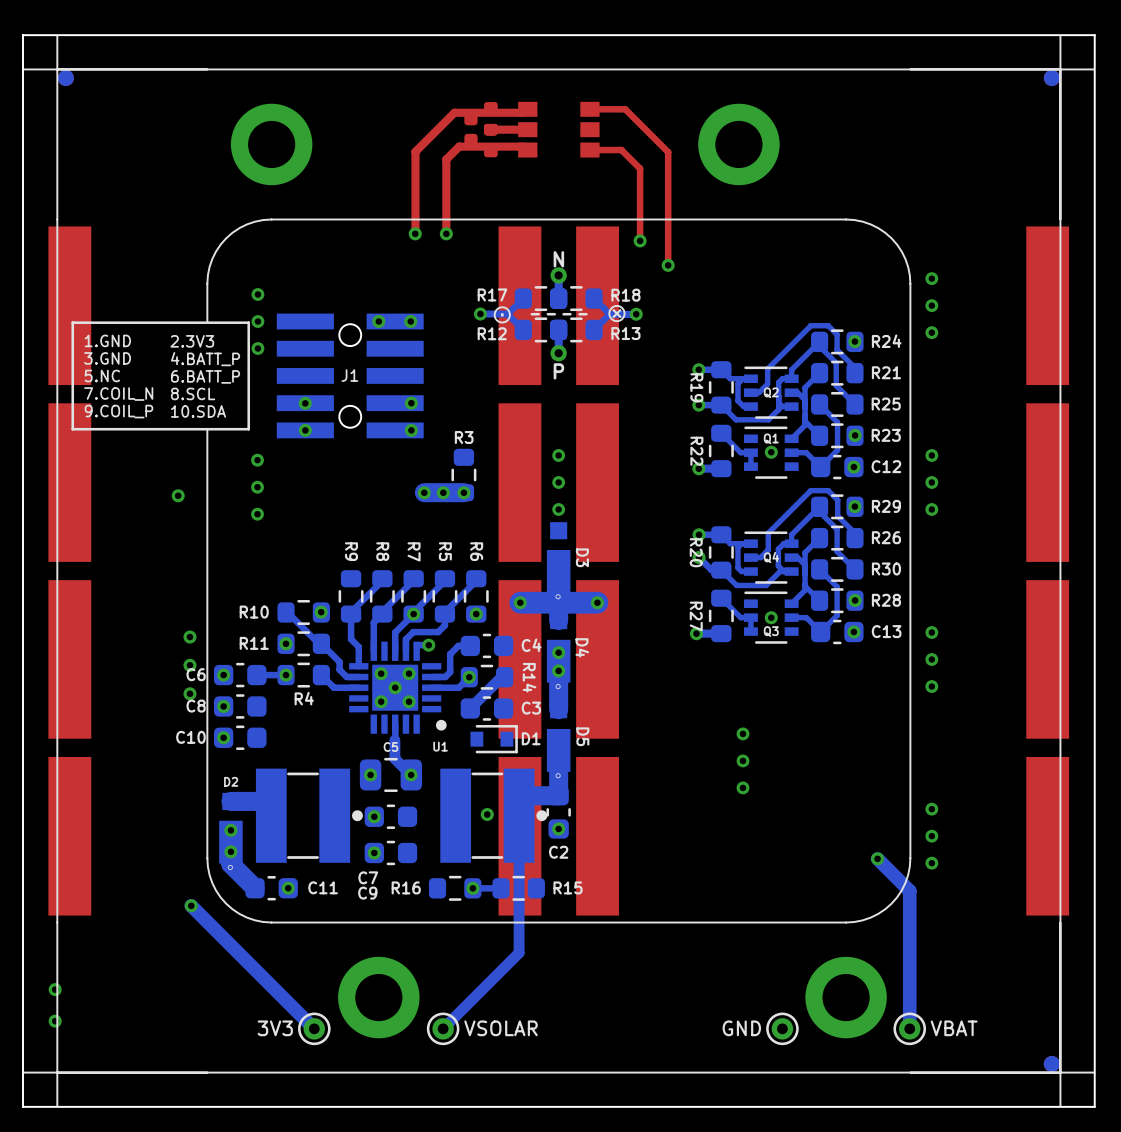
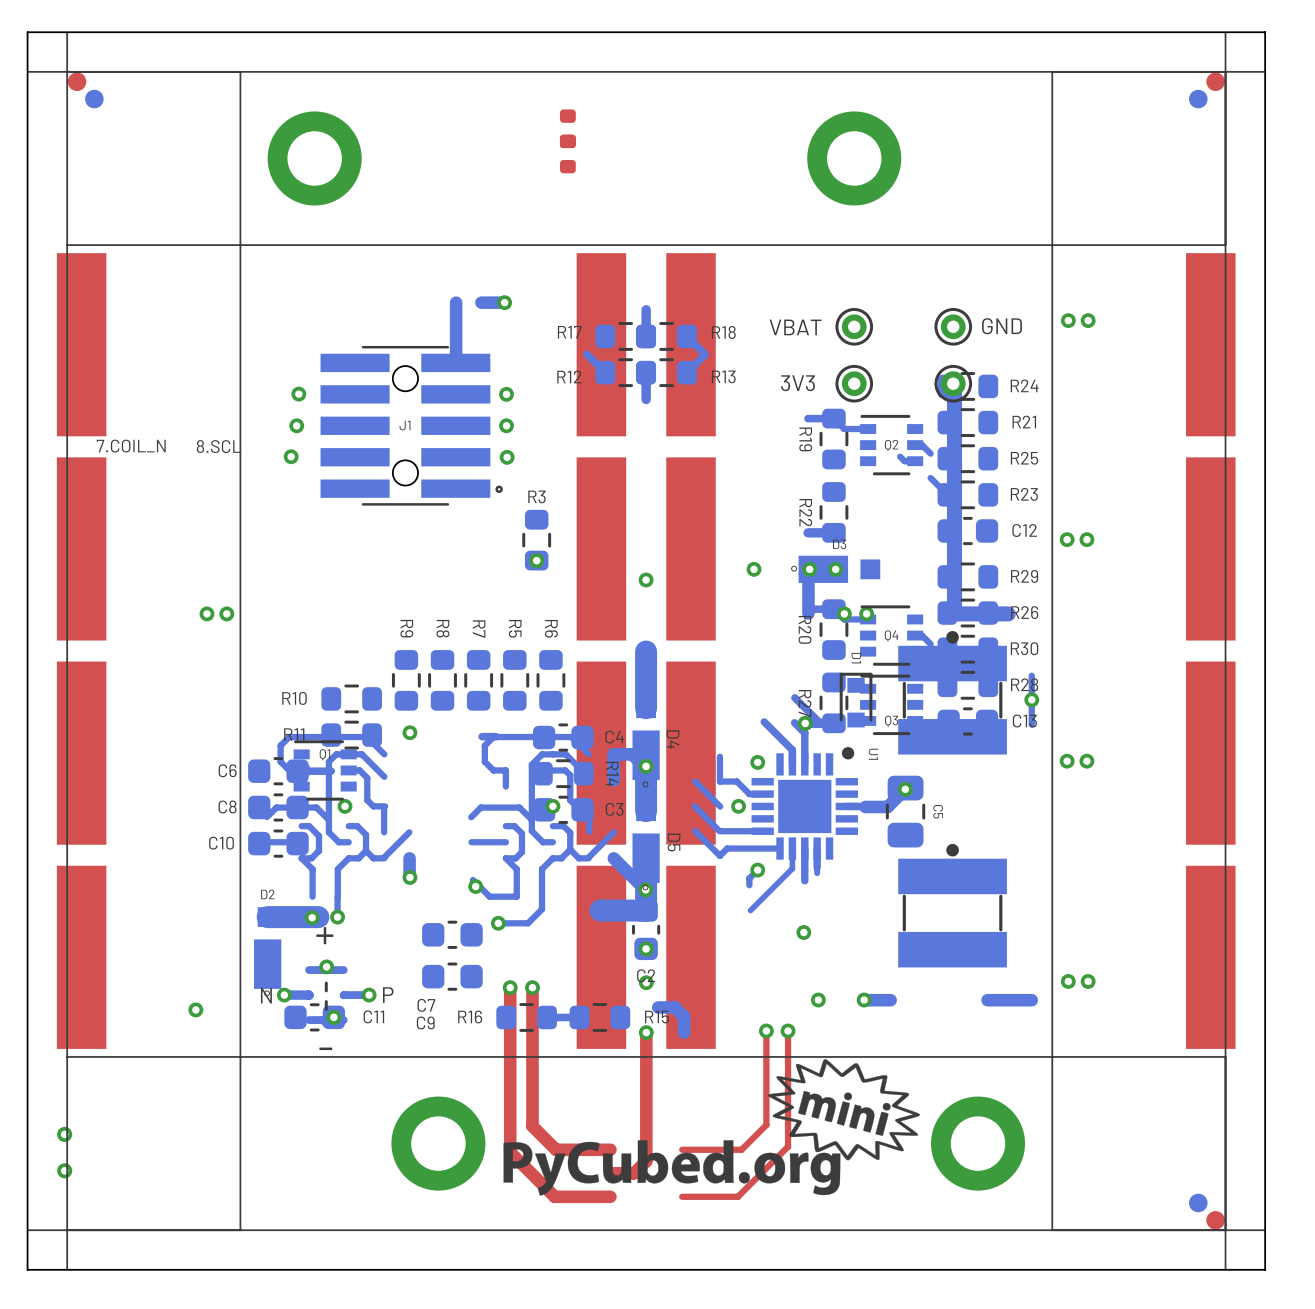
line: none -> (1052, 71) (1052, 319)
part position: (65, 78) -> (94, 99)
part position: (1051, 78) -> (1198, 99)
top track: (589, 109) (625, 109) (668, 152) (668, 265) -> none
top track: (524, 112) (454, 112) (415, 151) (415, 233) -> none
part: (470, 129) -> none
top track: (527, 129) (490, 129) -> none
part: (558, 129) -> none
top track: (524, 146) (459, 146) (446, 159) (446, 233) -> none
top track: (589, 150) (621, 150) (640, 168) (640, 240) -> none
line: (271, 219) (247, 224) (226, 238) (212, 259) (207, 283) -> (240, 71) (240, 319)
line: none -> (314, 245) (67, 245)
line: (846, 219) (870, 224) (891, 238) (905, 259) (910, 283) -> (978, 245) (1225, 245)
via: (415, 233) -> none
via: (446, 233) -> none
via: (640, 240) -> none
text: N (558, 259) -> none
via: (668, 265) -> none
bottom track: none -> (456, 302) (456, 362)
bottom track: none -> (504, 302) (481, 302)
via: none -> (504, 302)
via: (558, 275) -> none
via: (931, 278) -> none
via: none -> (1068, 320)
via: none -> (1088, 320)
text: none -> GND (1002, 326)
text: none -> VBAT (795, 327)
part: none -> (854, 326)
part: none -> (953, 326)
via: (257, 294) -> none
bottom track: (523, 298) (507, 314) (480, 314) -> none
via: (931, 305) -> none
J1 footprint: [276, 313, 424, 439] -> [320, 345, 503, 506]
text: ⊗ (616, 313) -> none
via: (480, 314) -> none
text: ⊙ (502, 314) -> none
line: (538, 314) (531, 314) -> none
line: (554, 314) (547, 314) -> none
line: (570, 314) (563, 314) -> none
line: (586, 314) (579, 314) -> none
bottom track: (636, 314) (609, 314) -> none
via: (636, 314) -> none
line: none -> (240, 363) (240, 487)
via: (257, 321) -> none
via: (378, 321) -> none
via: (410, 321) -> none
line: (248, 322) (72, 322) (72, 429) (248, 429) (248, 322) -> none
via: (931, 332) -> none
text: none -> 3V3 (798, 383)
part: none -> (854, 383)
part: none -> (953, 383)
text: 1.GND (107, 340) -> none
bottom track: none -> (954, 384) (954, 613) (1008, 613)
text: 2.3V3 (192, 341) -> none
bottom track: (819, 341) (791, 369) (791, 378) (782, 378) (778, 382) (778, 409) (768, 419) (736, 419) (721, 405) (698, 405) -> none
via: (854, 341) -> none
bottom track: (819, 346) (836, 362) (836, 385) (854, 404) -> none
via: none -> (506, 394)
via: (558, 353) -> none
text: 3.GND (107, 358) -> none
text: 4.BATT_P (205, 359) -> none
bottom track: (854, 367) (837, 349) (837, 334) (828, 325) (810, 325) (767, 368) (767, 383) (758, 392) (750, 392) -> none
via: (698, 369) -> none
text: P (558, 371) -> none
bottom track: (819, 373) (805, 387) (805, 425) (791, 438) -> none
text: 5.NC (102, 375) -> none
via: none -> (296, 425)
via: none -> (506, 425)
text: 6.BATT_P (205, 376) -> none
bottom track: (743, 378) (737, 383) (737, 400) (743, 406) (750, 406) -> none
via: none -> (291, 456)
via: (305, 403) -> none
via: (411, 403) -> none
via: none -> (507, 457)
bottom track: (819, 404) (837, 422) (837, 450) (820, 467) (806, 452) (791, 452) -> none
via: (698, 405) -> none
text: 9.COIL_P (118, 411) -> none
text: 10.SDA (198, 411) -> none
via: (305, 430) -> none
via: (411, 430) -> none
bottom track: (721, 433) (740, 452) (750, 452) (750, 466) -> none
via: (855, 435) -> none
Q1 position: (771, 452) -> (325, 770)
via: (771, 452) -> none
via: (558, 455) -> none
via: (931, 455) -> none
via: (257, 460) -> none
via: (853, 467) -> none
via: (698, 468) -> none
via: none -> (1067, 539)
via: none -> (1086, 539)
via: (558, 482) -> none
via: (931, 482) -> none
via: (257, 487) -> none
via: (424, 492) -> none
via: (443, 492) -> none
bottom track: (463, 492) (424, 492) -> none
via: (178, 495) -> none
via: none -> (754, 569)
via: none -> (809, 569)
via: none -> (835, 569)
bottom track: (819, 506) (791, 534) (791, 543) (783, 543) (778, 549) (778, 565) (783, 571) -> none
via: (854, 506) -> none
via: (931, 509) -> none
bottom track: (819, 511) (837, 529) (837, 551) (854, 569) -> none
bottom track: none -> (808, 584) (808, 613)
via: (257, 514) -> none
bottom track: (854, 533) (837, 516) (837, 500) (828, 490) (810, 490) (768, 533) (768, 549) (760, 557) (750, 557) -> none
via: (699, 534) -> none
via: none -> (207, 613)
via: none -> (226, 613)
via: none -> (844, 613)
via: none -> (866, 613)
bottom track: (819, 538) (805, 552) (805, 590) (791, 603) -> none
bottom track: (741, 543) (737, 547) (737, 567) (741, 571) (750, 571) -> none
bottom track: (699, 557) (711, 570) (721, 570) (736, 585) (766, 585) (780, 571) (791, 571) -> none
via: (699, 557) -> none
D3 rotation: 0° (558, 560) -> 90° clockwise (835, 569)
D3 position: (558, 560) -> (835, 569)
bottom track: (819, 569) (837, 586) (837, 615) (820, 631) (806, 617) (791, 617) -> none
bottom track: (382, 580) (351, 612) -> none
bottom track: (413, 580) (382, 611) -> none
bottom track: (444, 580) (413, 612) -> none
bottom track: (476, 580) (444, 612) -> none
bottom track: none -> (1031, 675) (1031, 724)
bottom track: (721, 598) (740, 617) (750, 617) (750, 631) -> none
via: (855, 600) -> none
via: (520, 602) -> none
bottom track: (597, 602) (520, 602) -> none
via: (597, 602) -> none
part: none -> (952, 692)
bottom track: none -> (794, 697) (819, 722)
bottom track: (287, 612) (318, 643) -> none
via: (321, 612) -> none
via: none -> (1031, 699)
bottom track: (351, 614) (351, 639) (358, 646) (358, 666) -> none
bottom track: (382, 614) (373, 622) (373, 651) -> none
bottom track: (413, 614) (395, 632) (395, 651) -> none
via: (413, 614) -> none
bottom track: (444, 614) (444, 625) (438, 632) (413, 632) (405, 639) (405, 651) -> none
via: (476, 614) -> none
via: (771, 617) -> none
via: (853, 631) -> none
bottom track: none -> (764, 721) (792, 750) (792, 764)
via: (931, 632) -> none
bottom track: none -> (794, 722) (804, 732) (804, 764)
via: (189, 637) -> none
via: none -> (409, 732)
via: (286, 643) -> none
bottom track: (321, 643) (339, 662) (339, 669) (346, 677) (358, 677) -> none
via: (428, 645) -> none
bottom track: (470, 645) (458, 645) (450, 654) (450, 672) (445, 677) (431, 677) -> none
via: (558, 652) -> none
via: (931, 659) -> none
bottom track: none -> (384, 754) (367, 737) (289, 737) (280, 745) (280, 761) (289, 770) (301, 770) (301, 786)
bottom track: none -> (588, 754) (571, 737) (493, 737) (484, 745) (484, 761) (493, 770) (505, 770) (505, 786)
bottom track: none -> (719, 756) (719, 781) (736, 781) (749, 794) (762, 794)
via: (189, 665) -> none
via: none -> (1067, 761)
via: none -> (1086, 761)
via: none -> (757, 762)
bottom track: none -> (646, 768) (632, 754) (613, 754) (613, 780)
via: (381, 673) -> none
via: (409, 673) -> none
bottom track: none -> (348, 770) (359, 770) (367, 777) (367, 800) (373, 806) (385, 806)
bottom track: none -> (552, 770) (565, 770) (570, 775) (570, 800) (576, 806) (589, 806) (589, 831)
via: (223, 675) -> none
via: (286, 675) -> none
R4: (303, 675) -> none
bottom track: (321, 675) (334, 687) (358, 687) -> none
bottom track: (469, 677) (458, 687) (431, 687) -> none
via position: (469, 677) -> (552, 806)
bottom track: (501, 677) (470, 708) -> none
bottom track: none -> (384, 776) (361, 754) (336, 754) (328, 761) (328, 832) (338, 842) (348, 842)
bottom track: none -> (588, 777) (565, 754) (542, 754) (531, 764) (531, 831) (543, 842) (552, 842)
bottom track: none -> (695, 781) (720, 806)
via: (931, 686) -> none
via: (395, 687) -> none
U1 rotation: 0° (397, 687) -> 90° counterclockwise (804, 803)
U1 position: (397, 687) -> (804, 803)
bottom track: none -> (905, 789) (887, 806) (846, 806)
via: none -> (905, 789)
via: (189, 693) -> none
via: (381, 701) -> none
via: (409, 701) -> none
via: none -> (344, 806)
bottom track: none -> (694, 806) (719, 831)
via: none -> (738, 806)
via: (223, 706) -> none
bottom track: none -> (384, 807) (384, 832)
bottom track: none -> (267, 816) (276, 807) (316, 807) (328, 819)
bottom track: none -> (471, 817) (480, 807) (519, 807) (531, 819)
bottom track: none -> (301, 826) (309, 826) (319, 836) (319, 850) (311, 858) (301, 858) (312, 869) (312, 896)
bottom track: none -> (348, 826) (357, 826) (366, 834) (366, 850)
bottom track: none -> (505, 826) (514, 826) (521, 833) (521, 852) (515, 858) (505, 858) (516, 869) (516, 896) (489, 896) (472, 879)
bottom track: none -> (552, 826) (563, 826) (570, 832) (570, 849)
bottom track: (395, 724) (394, 758) (411, 774) -> none
bottom track: none -> (695, 831) (719, 855) (727, 848) (780, 848)
bottom track: none -> (762, 831) (720, 831)
bottom track: none -> (409, 832) (384, 857)
bottom track: none -> (613, 832) (588, 857)
via: (742, 733) -> none
bottom track: none -> (301, 842) (267, 842)
bottom track: none -> (505, 842) (471, 842)
via: (223, 737) -> none
D1 rotation: 0° (494, 739) -> 90° counterclockwise (856, 700)
D1 position: (494, 739) -> (856, 700)
bottom track: none -> (792, 848) (792, 868) (750, 910)
bottom track: none -> (804, 848) (804, 880)
bottom track: none -> (817, 848) (817, 873)
bottom track: none -> (570, 849) (578, 858) (588, 858)
bottom track: none -> (570, 849) (561, 858) (552, 858) (542, 869) (542, 909) (528, 923) (498, 923)
bottom track: none -> (366, 850) (358, 858) (348, 858) (337, 869) (337, 896)
bottom track: none -> (366, 850) (373, 858) (384, 858)
bottom track: none -> (409, 858) (409, 877)
bottom track: none -> (613, 858) (645, 889)
bottom track: none -> (757, 870) (749, 878) (749, 885)
via: none -> (757, 870)
via: (742, 760) -> none
via position: (370, 774) -> (409, 877)
C5 rotation: 0° (390, 774) -> 90° clockwise (905, 811)
C5 position: (390, 774) -> (905, 811)
via: none -> (645, 889)
bottom track: none -> (337, 896) (337, 917)
via: (742, 787) -> none
part: none -> (952, 905)
via: none -> (312, 917)
via: none -> (337, 917)
via: none -> (498, 923)
via: (931, 809) -> none
via: (487, 814) -> none
via: none -> (803, 932)
part: (309, 815) -> none
part: (493, 815) -> none
bottom track: (519, 815) (519, 952) (443, 1028) -> none
via: (374, 816) -> none
text: none -> + (324, 935)
via: (230, 830) -> none
via: (931, 836) -> none
via: none -> (326, 966)
bottom track: none -> (343, 970) (329, 970) (326, 966) (323, 970) (309, 970)
bottom track: (230, 851) (230, 864) (255, 888) -> none
via: (230, 851) -> none
via: (374, 852) -> none
via: none -> (1068, 981)
via: none -> (1088, 981)
line: (207, 858) (212, 882) (226, 903) (247, 917) (271, 922) -> (240, 982) (240, 1230)
line: none -> (326, 983) (326, 990)
via: none -> (646, 982)
bottom track: (877, 858) (909, 891) (909, 1028) -> none
via: (877, 858) -> none
line: (910, 858) (905, 882) (891, 903) (870, 917) (846, 922) -> (1052, 982) (1052, 1230)
top track: none -> (510, 987) (510, 1152) (554, 1196) (610, 1196)
via: none -> (510, 987)
top track: none -> (532, 987) (532, 1126) (556, 1149) (610, 1149)
via: none -> (532, 987)
via: (931, 863) -> none
via: none -> (284, 995)
bottom track: none -> (308, 995) (284, 995)
bottom track: none -> (369, 995) (343, 995)
via: none -> (369, 995)
text: none -> P (388, 995)
text: none -> N (266, 995)
via: none -> (818, 1000)
via: none -> (864, 1000)
bottom track: none -> (890, 1000) (864, 1000)
bottom track: none -> (1031, 1000) (987, 1000)
line: none -> (326, 1001) (326, 1009)
bottom track: none -> (658, 1007) (674, 1007) (684, 1016) (684, 1032)
via: none -> (195, 1009)
via: (472, 888) -> none
bottom track: none -> (343, 1020) (330, 1020) (326, 1023) (322, 1020) (309, 1020)
top track: none -> (766, 1030) (766, 1125) (741, 1149) (682, 1149)
via: none -> (766, 1030)
top track: none -> (788, 1030) (788, 1146) (737, 1196) (682, 1196)
via: none -> (788, 1030)
top track: none -> (646, 1032) (646, 1161) (634, 1173) (610, 1173)
via: none -> (646, 1032)
bottom track: (191, 905) (314, 1028) -> none
via: (191, 905) -> none
text: none -> - (325, 1048)
line: none -> (314, 1056) (67, 1056)
line: none -> (1225, 1056) (978, 1056)
drawing: none -> [503, 1059, 921, 1196]
text: 3V3 (275, 1028) -> none
part: (314, 1028) -> none
part: (443, 1028) -> none
text: VSOLAR (501, 1028) -> none
text: GND (741, 1028) -> none
part: (782, 1028) -> none
part: (909, 1028) -> none
text: VBAT (954, 1028) -> none
part position: (1051, 1064) -> (1198, 1202)

